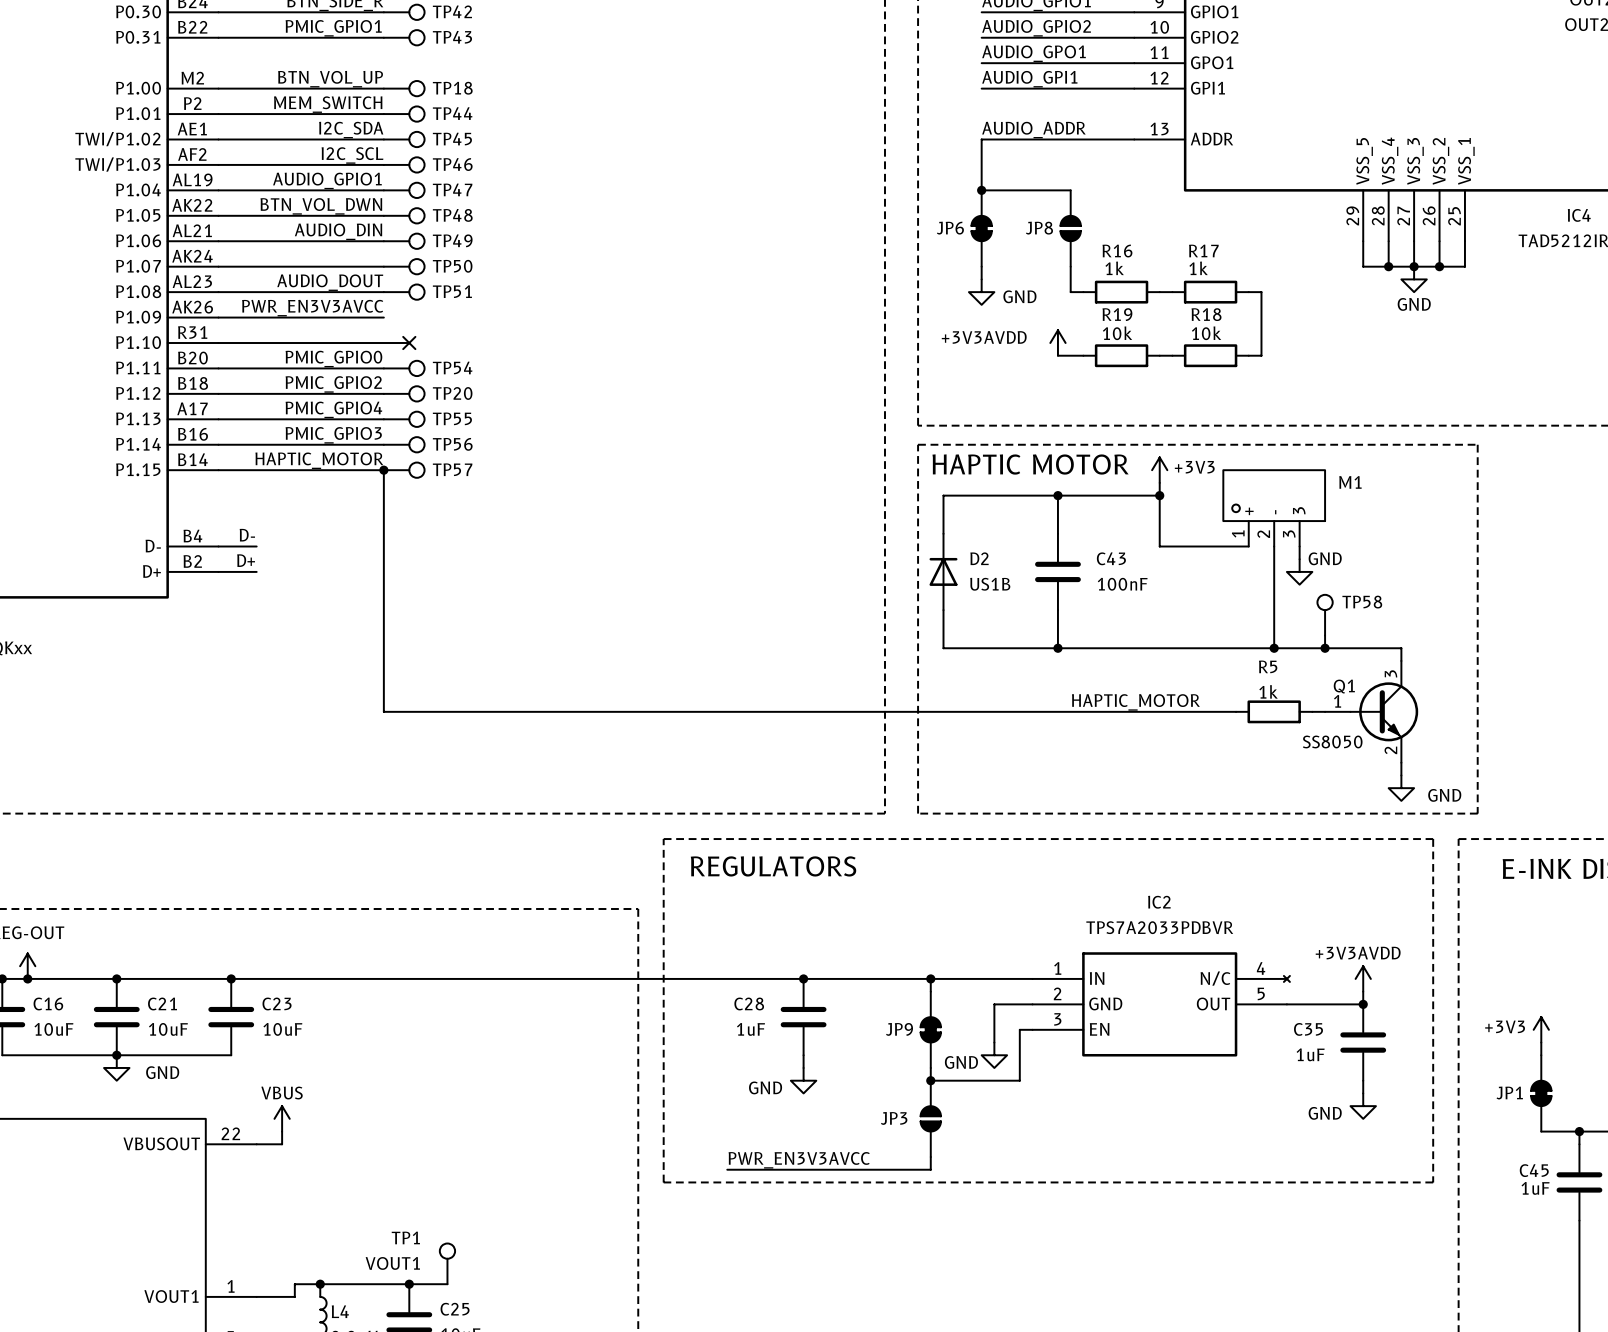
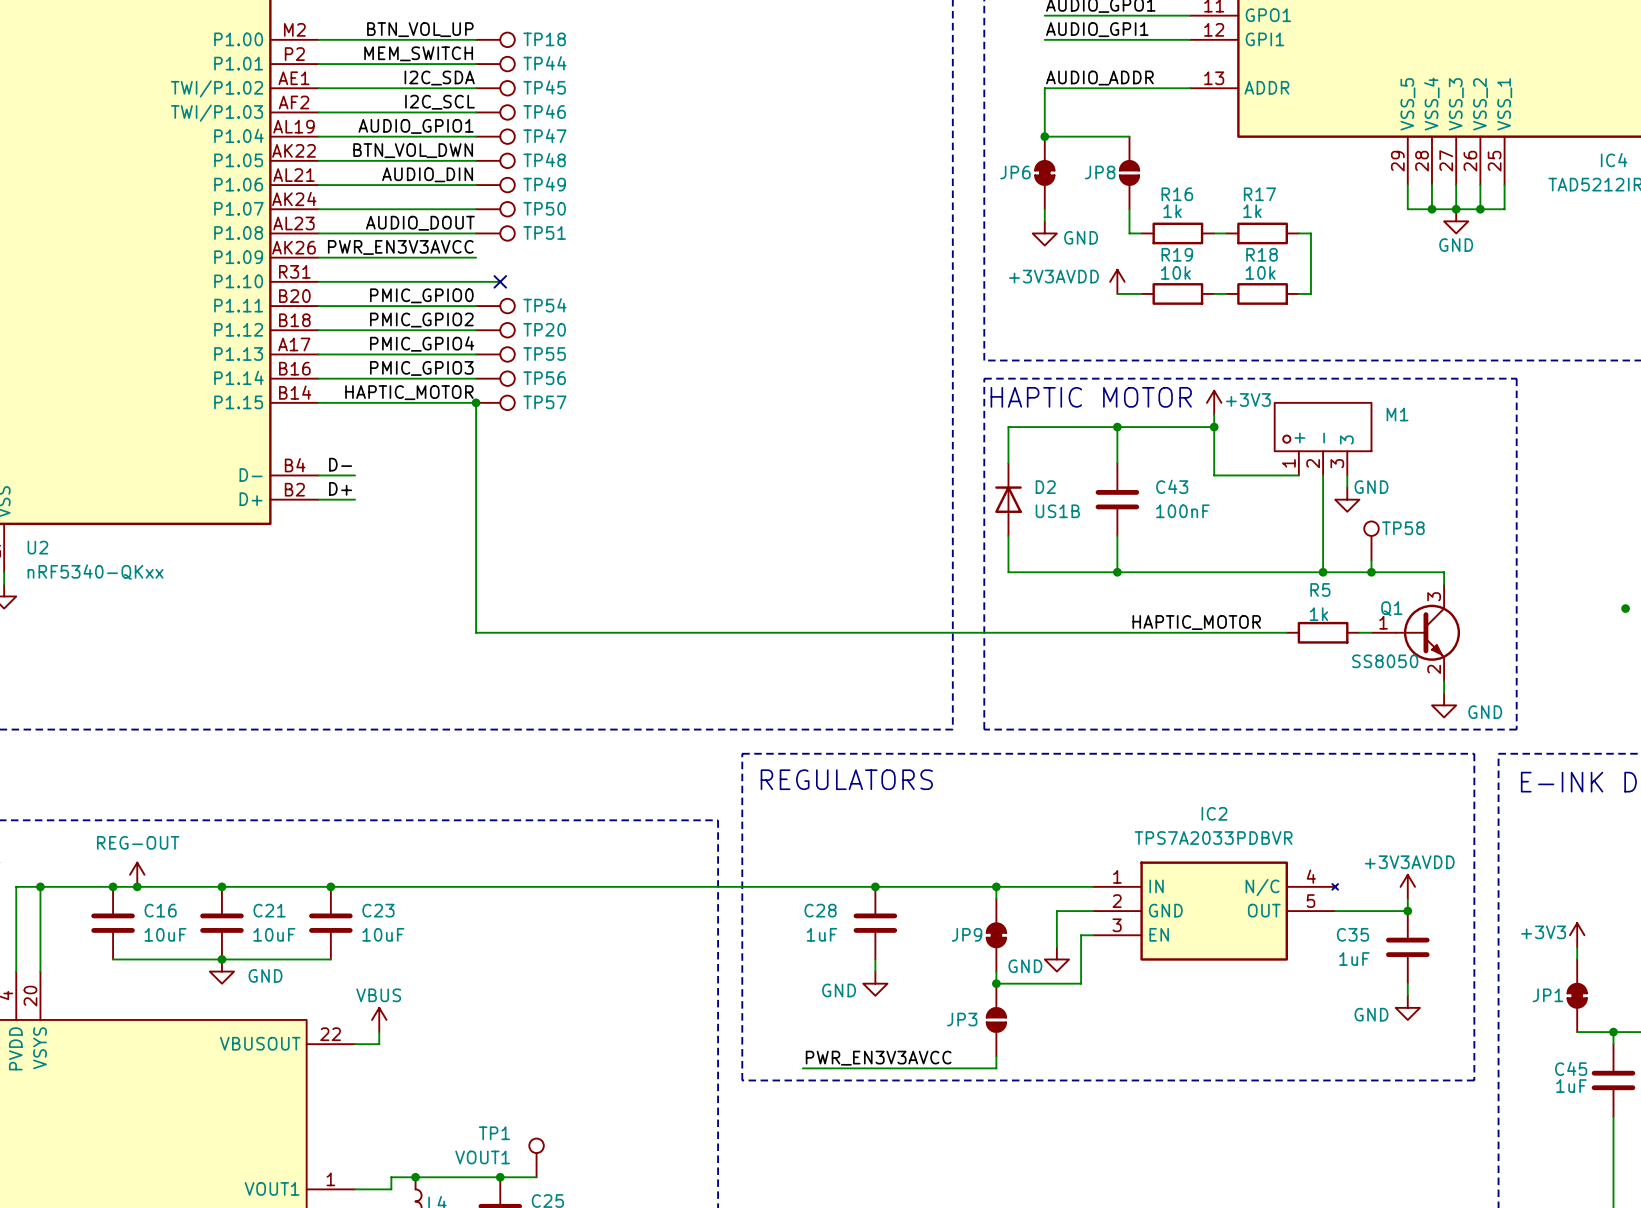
junction: none -> (1625, 608)

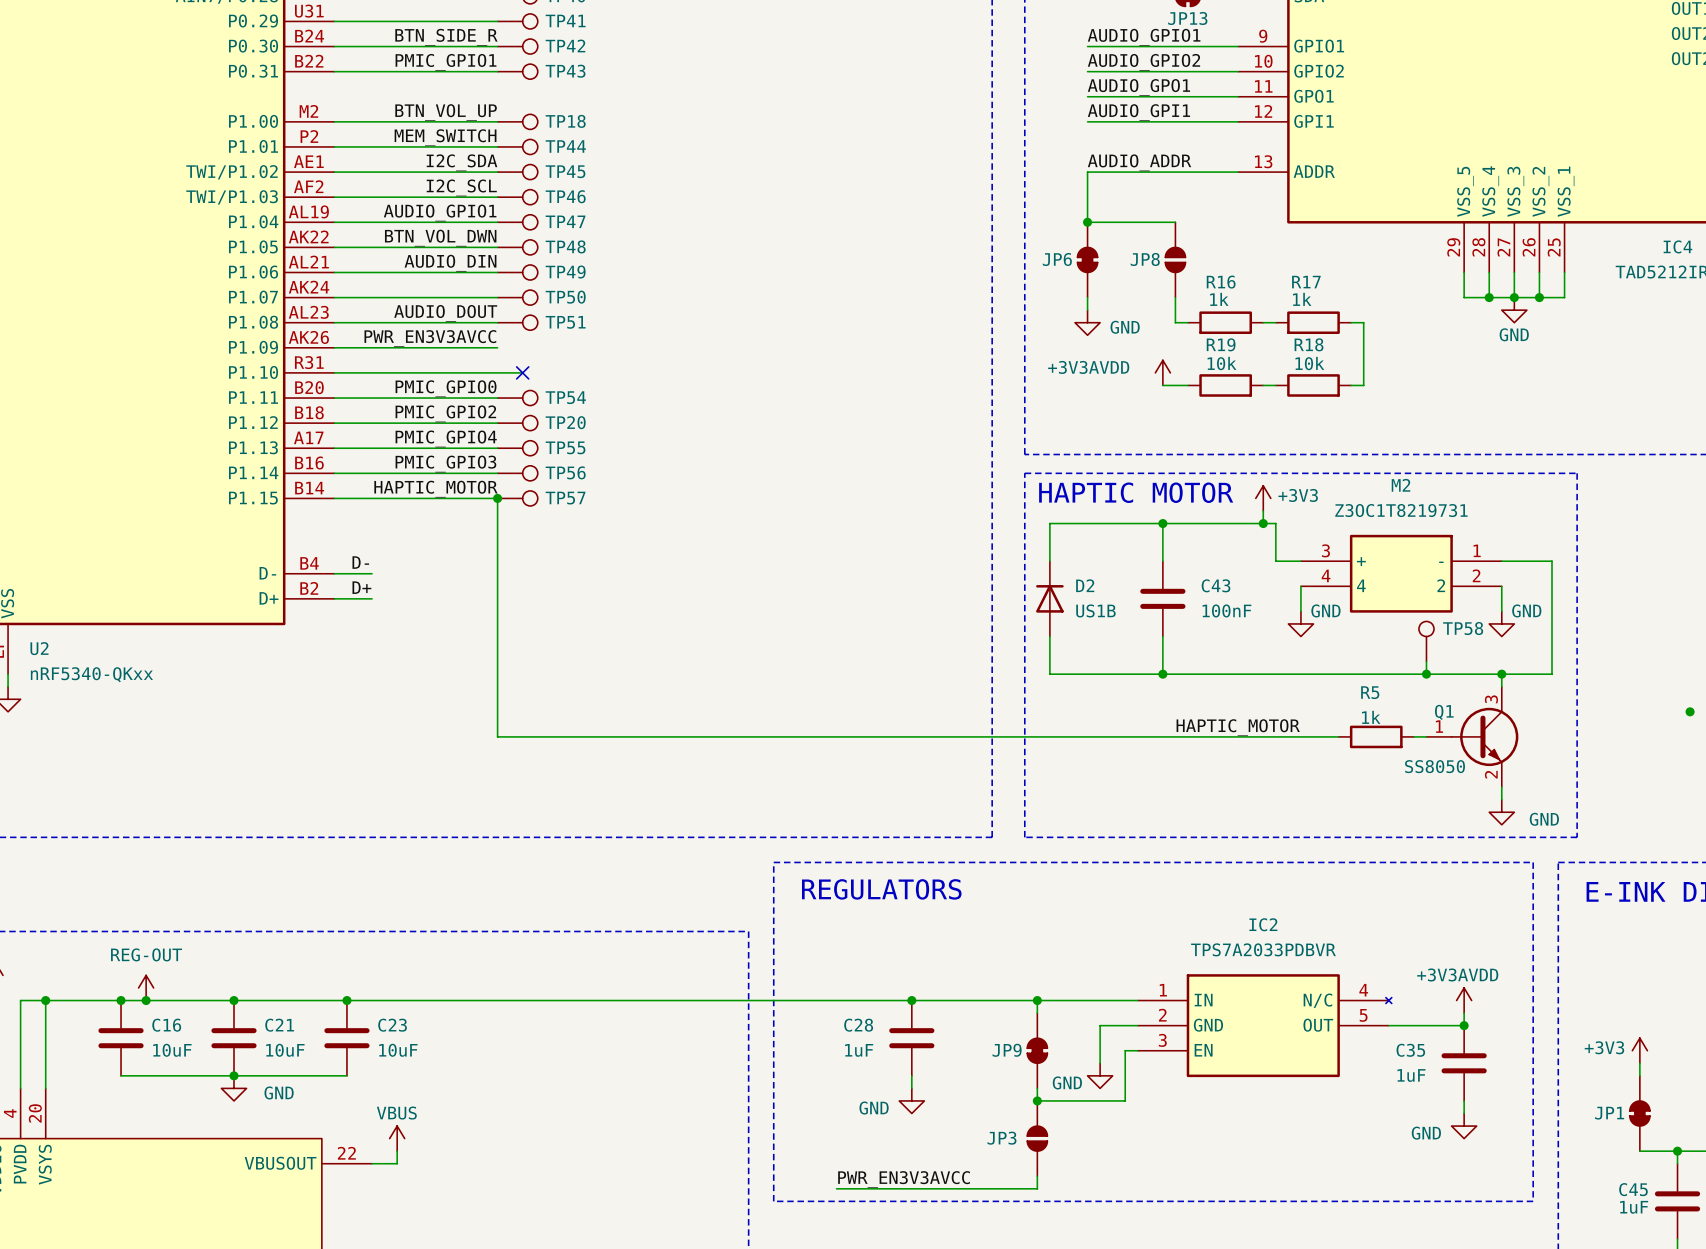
wire: (1214, 427) (1214, 475) (1298, 475) -> (1263, 523) (1275, 523) (1275, 561) (1300, 561)
M1: (1323, 439) -> none
wire: none -> (1501, 561) (1552, 561) (1552, 674) (1501, 674)
wire: (1323, 475) (1323, 572) -> none
M2: none -> Z3OC1T8219731 (1401, 573)
wire: none -> (1300, 586) (1300, 611)
wire: none -> (1501, 586) (1501, 611)
power symbol: GND (1347, 499) -> none
power symbol: none -> GND (1300, 623)
power symbol: none -> GND (1501, 623)
junction: (1323, 572) -> none
junction: none -> (1501, 674)

